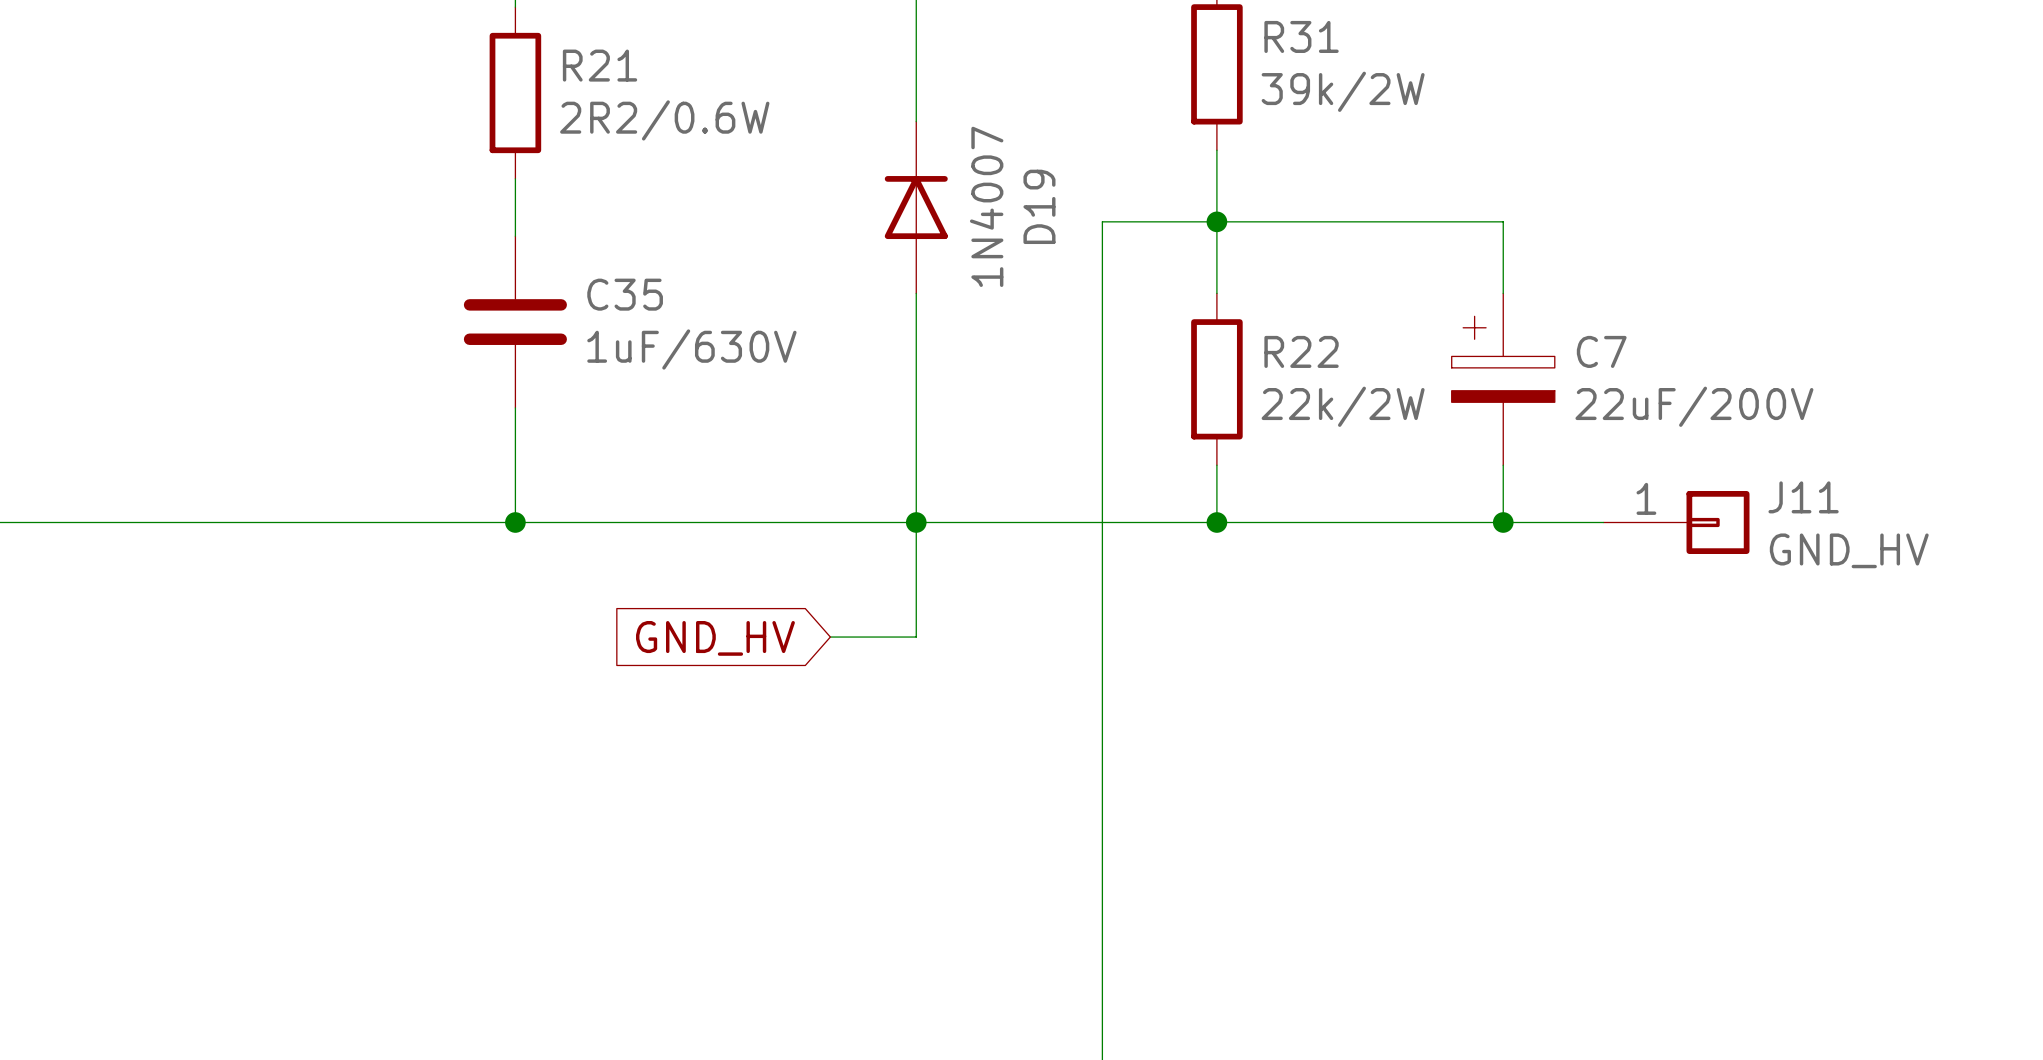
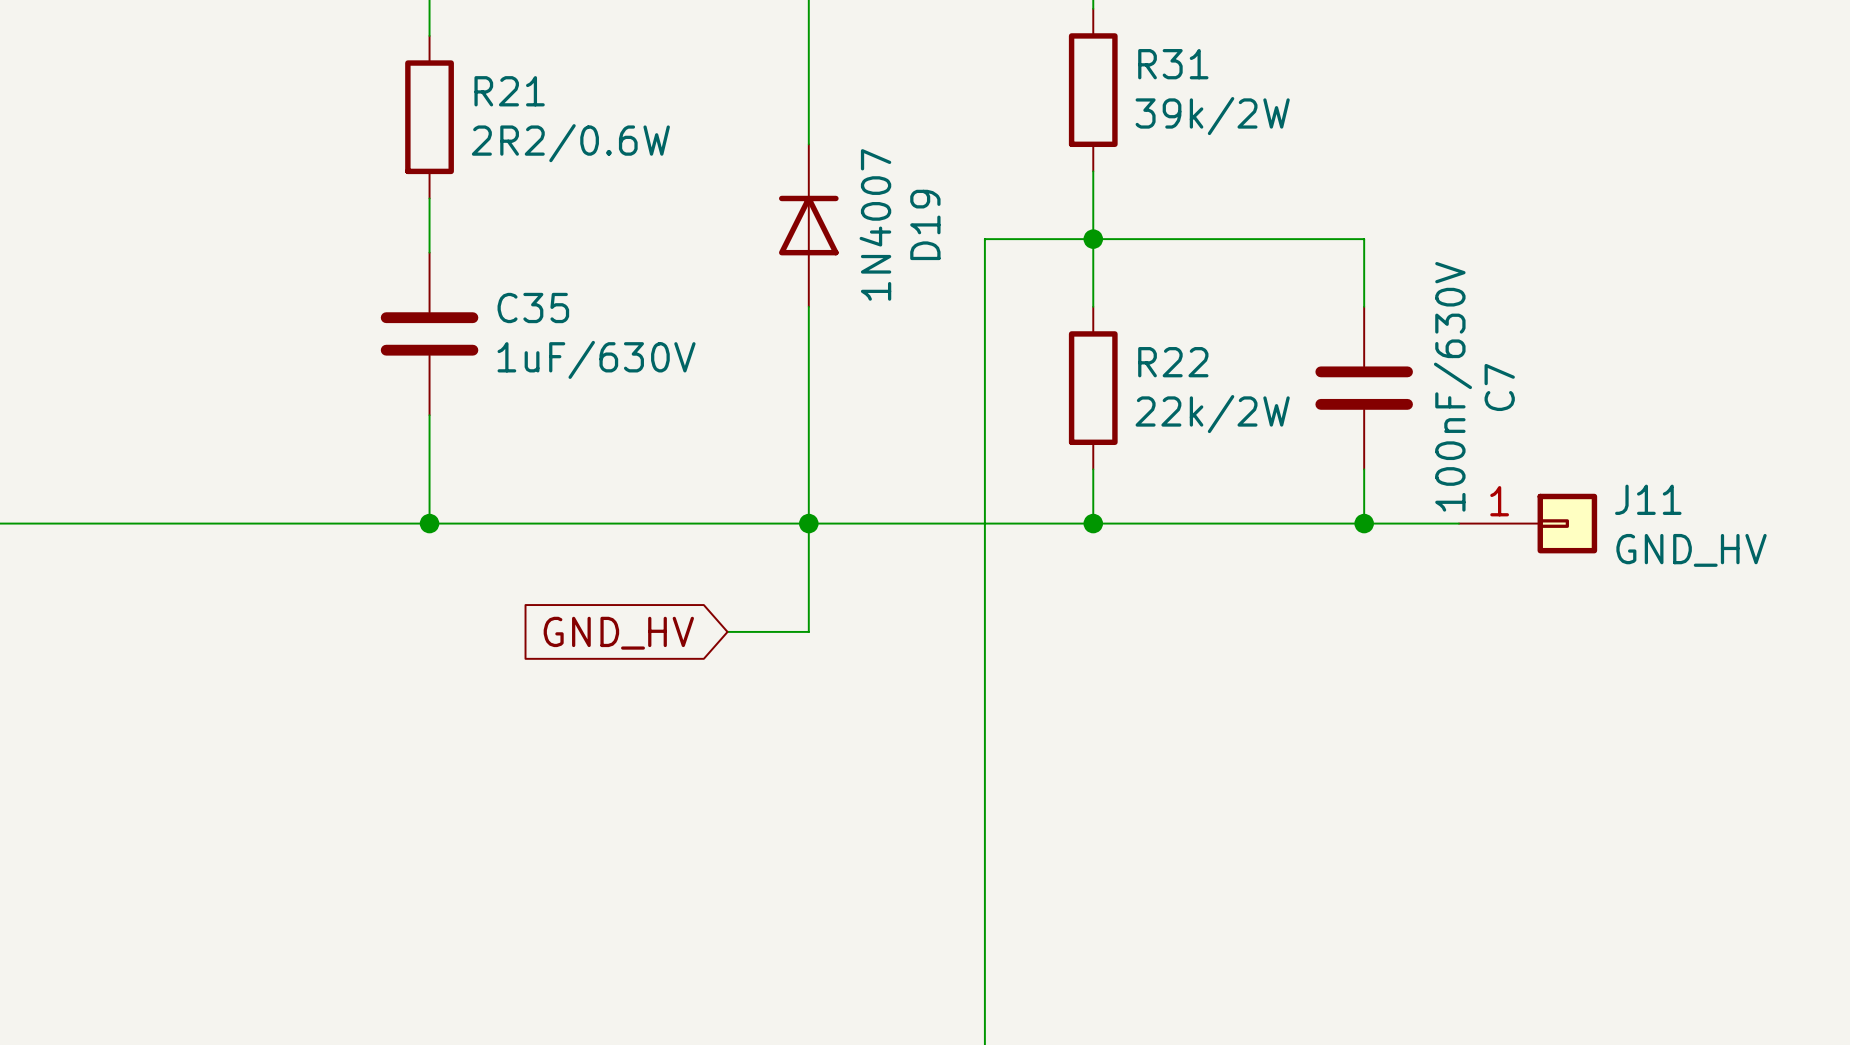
C7 symbol: [1451, 293, 1555, 466] -> [1315, 306, 1413, 470]
C7 name position: C7 (1601, 351) -> C7 (1499, 387)
C7 value: 22uF/200V (1694, 406) -> 100nF/630V (1452, 386)

